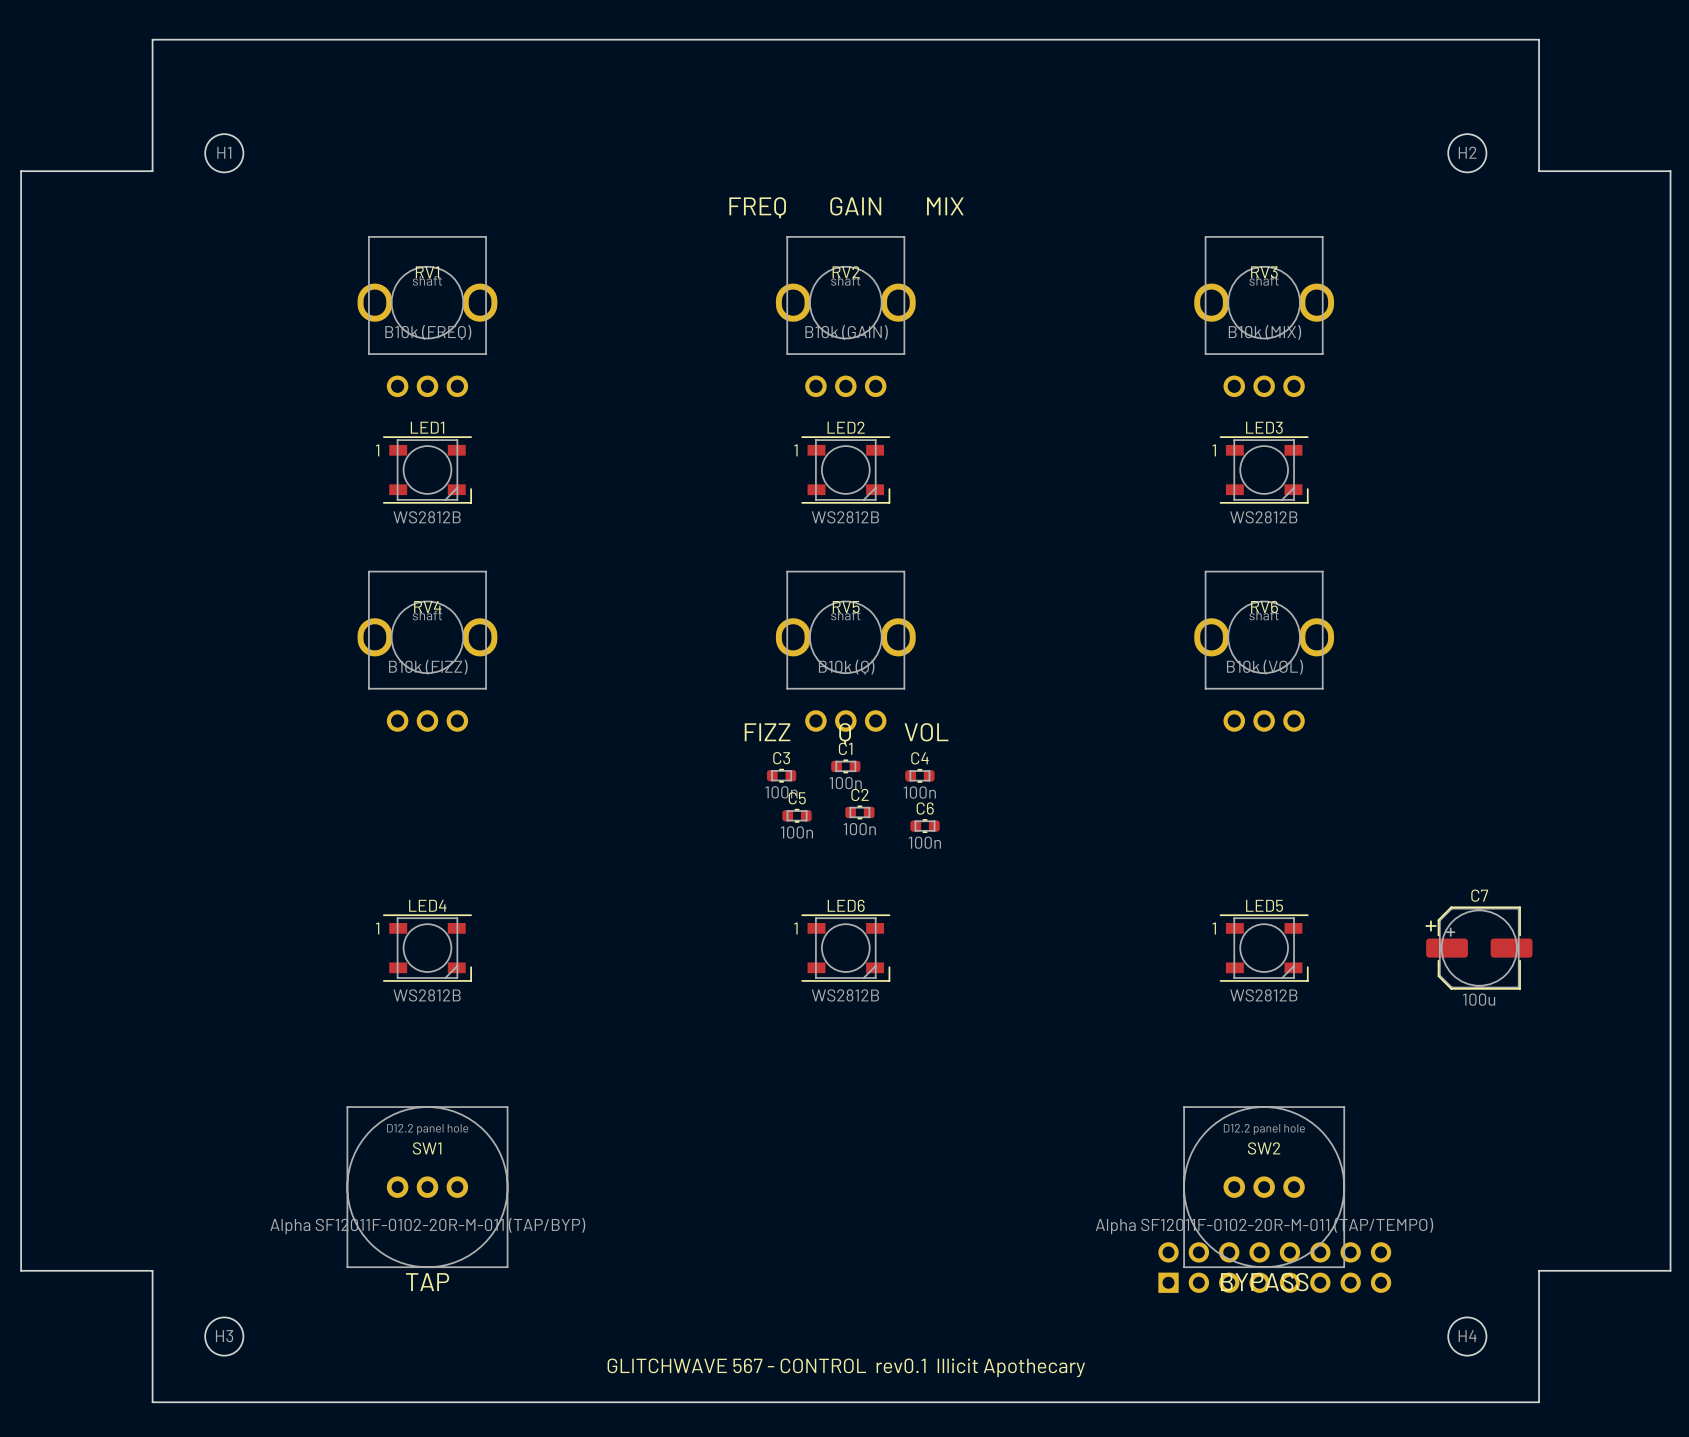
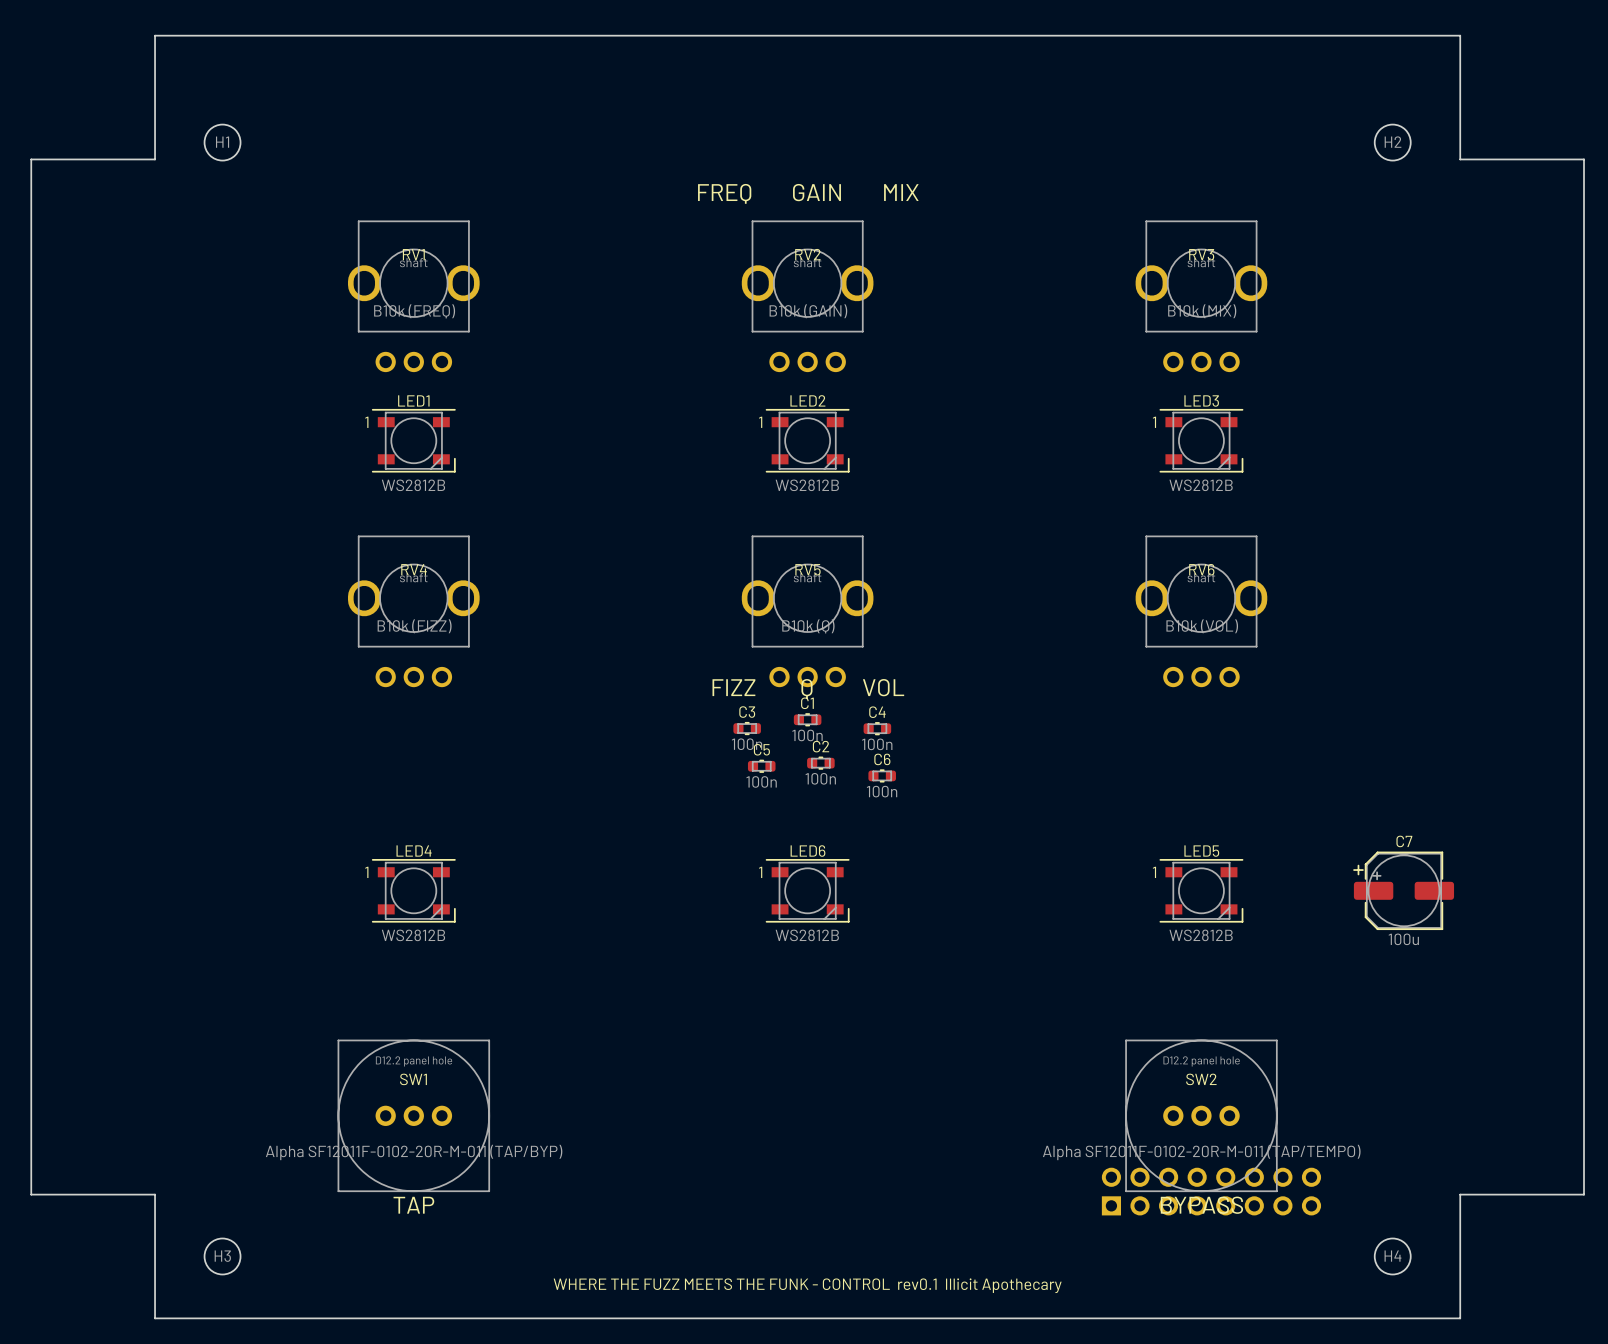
text: GLITCHWAVE 567 - CONTROL rev0.1 Illicit Apothecary (846, 1367) -> WHERE THE FUZZ MEETS THE FUNK - CONTROL rev0.1 Illicit Apothecary (807, 1285)

